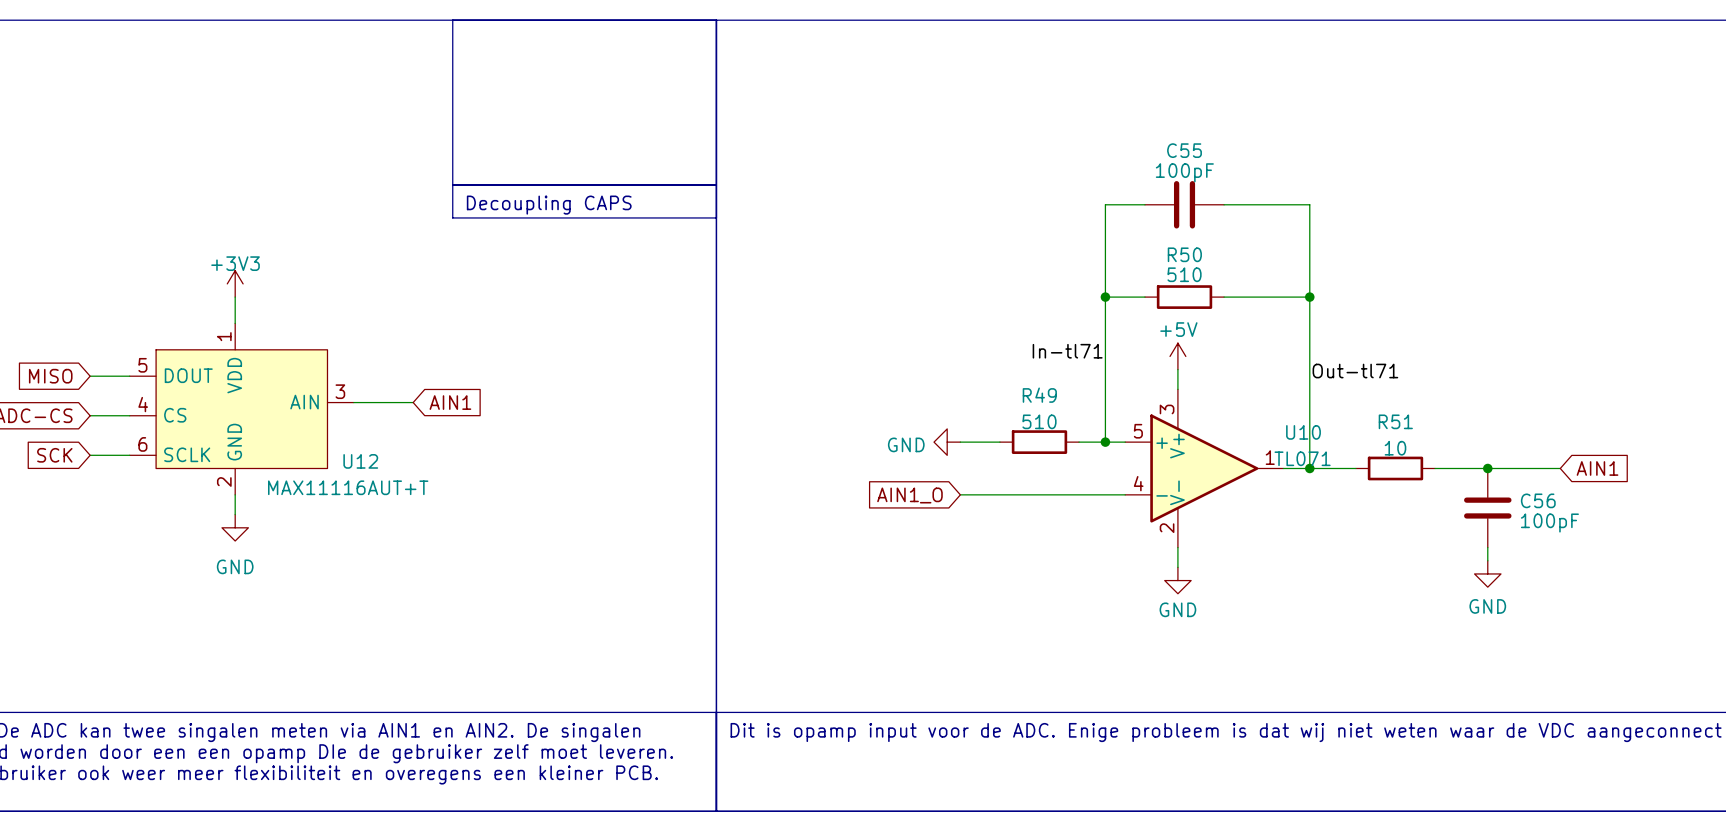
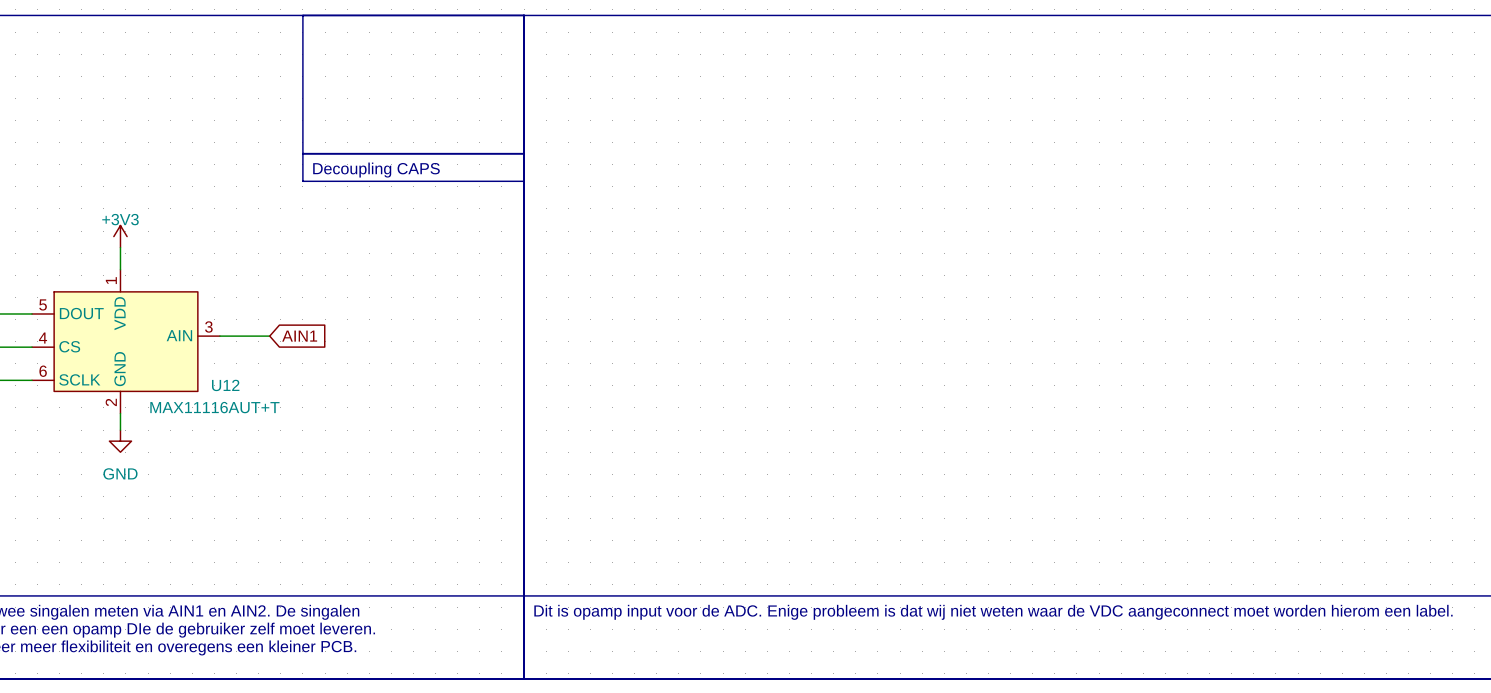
wire: (1144, 204) (1105, 204) (1105, 442) -> none
C55: 100pF (1184, 204) -> none
wire: (1224, 204) (1309, 204) (1309, 468) -> none
wire: (1105, 297) (1144, 297) -> none
junction: (1105, 297) -> none
R50: 510 (1184, 297) -> none
wire: (1224, 297) (1309, 297) -> none
junction: (1309, 297) -> none
label: In-tl71 (1067, 351) -> none
power symbol: +5V (1177, 356) -> none
wire: (1177, 369) (1177, 389) -> none
label: Out-tl71 (1355, 371) -> none
power symbol: GND (947, 442) -> none
wire: (960, 442) (999, 442) -> none
R49: 510 (1039, 442) -> none
wire: (1079, 442) (1125, 442) -> none
junction: (1105, 442) -> none
U10: TL071 (1204, 468) -> none
wire: (1283, 468) (1355, 468) -> none
junction: (1309, 468) -> none
R51: 10 (1395, 468) -> none
wire: (1435, 468) (1560, 468) -> none
junction: (1487, 468) -> none
global label: AIN1 (1597, 468) -> none
wire: (960, 494) (1125, 494) -> none
global label: AIN1_O (909, 495) -> none
C56: 100pF (1487, 508) -> none
wire: (1177, 547) (1177, 567) -> none
wire: (1487, 547) (1487, 560) -> none
power symbol: GND (1487, 573) -> none
power symbol: GND (1177, 580) -> none

